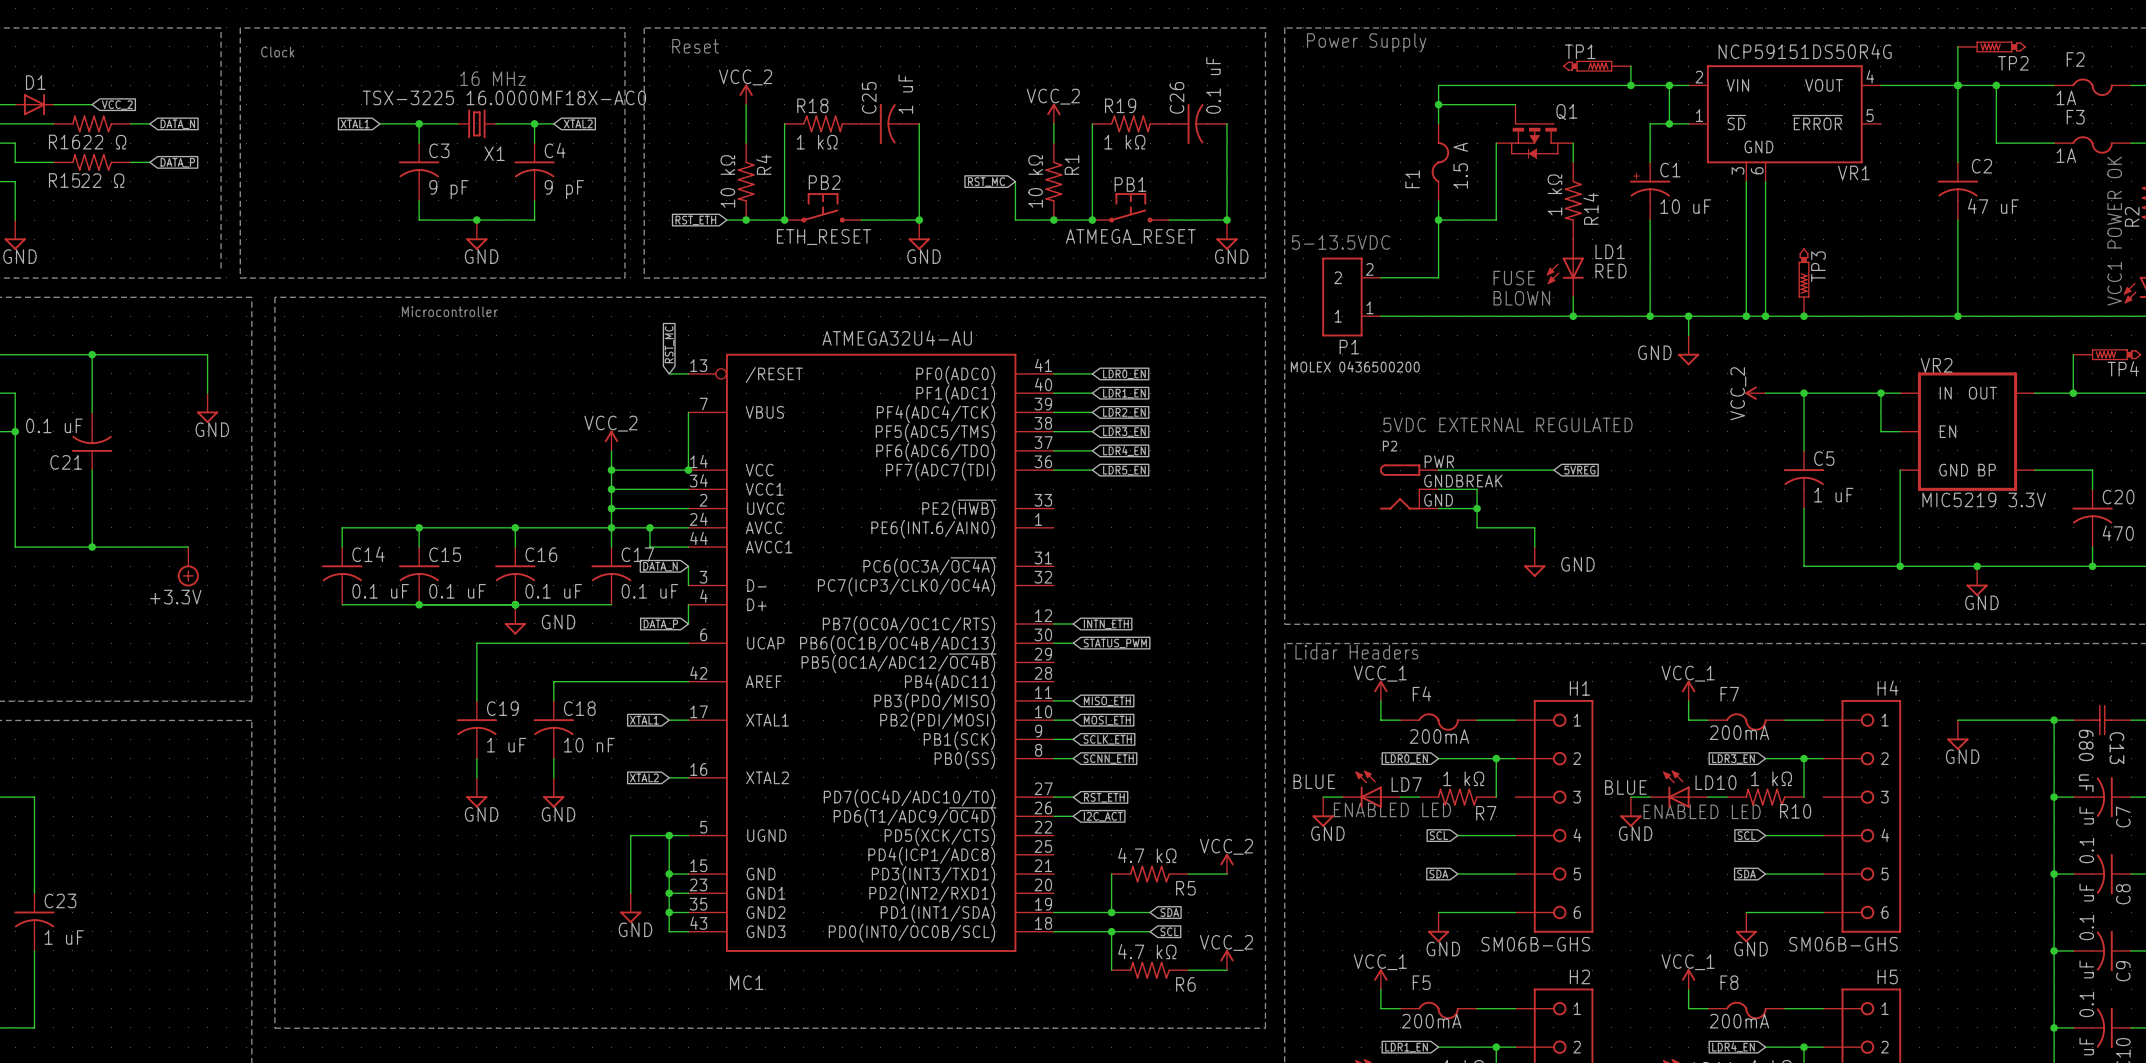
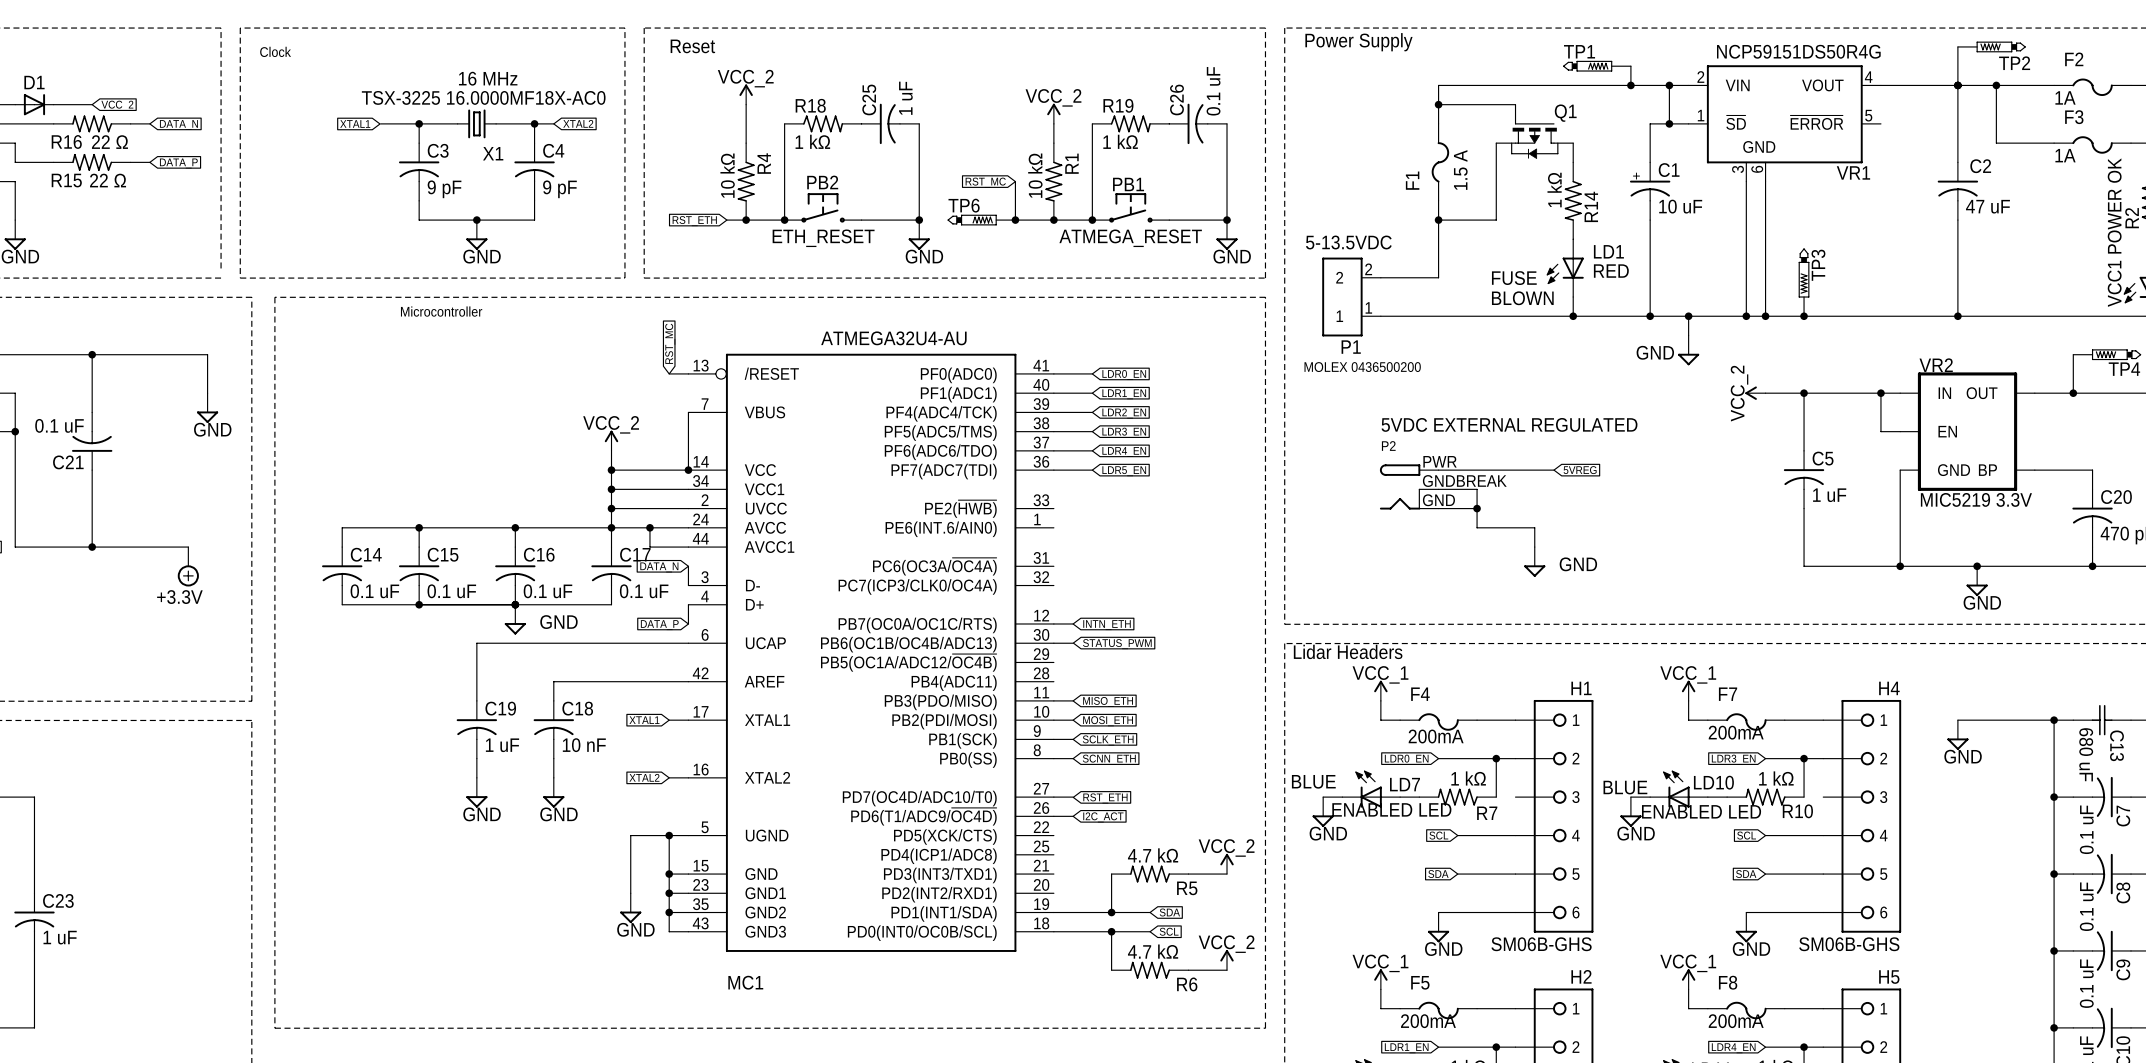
TP6: none -> (981, 220)
junction: none -> (1015, 220)

